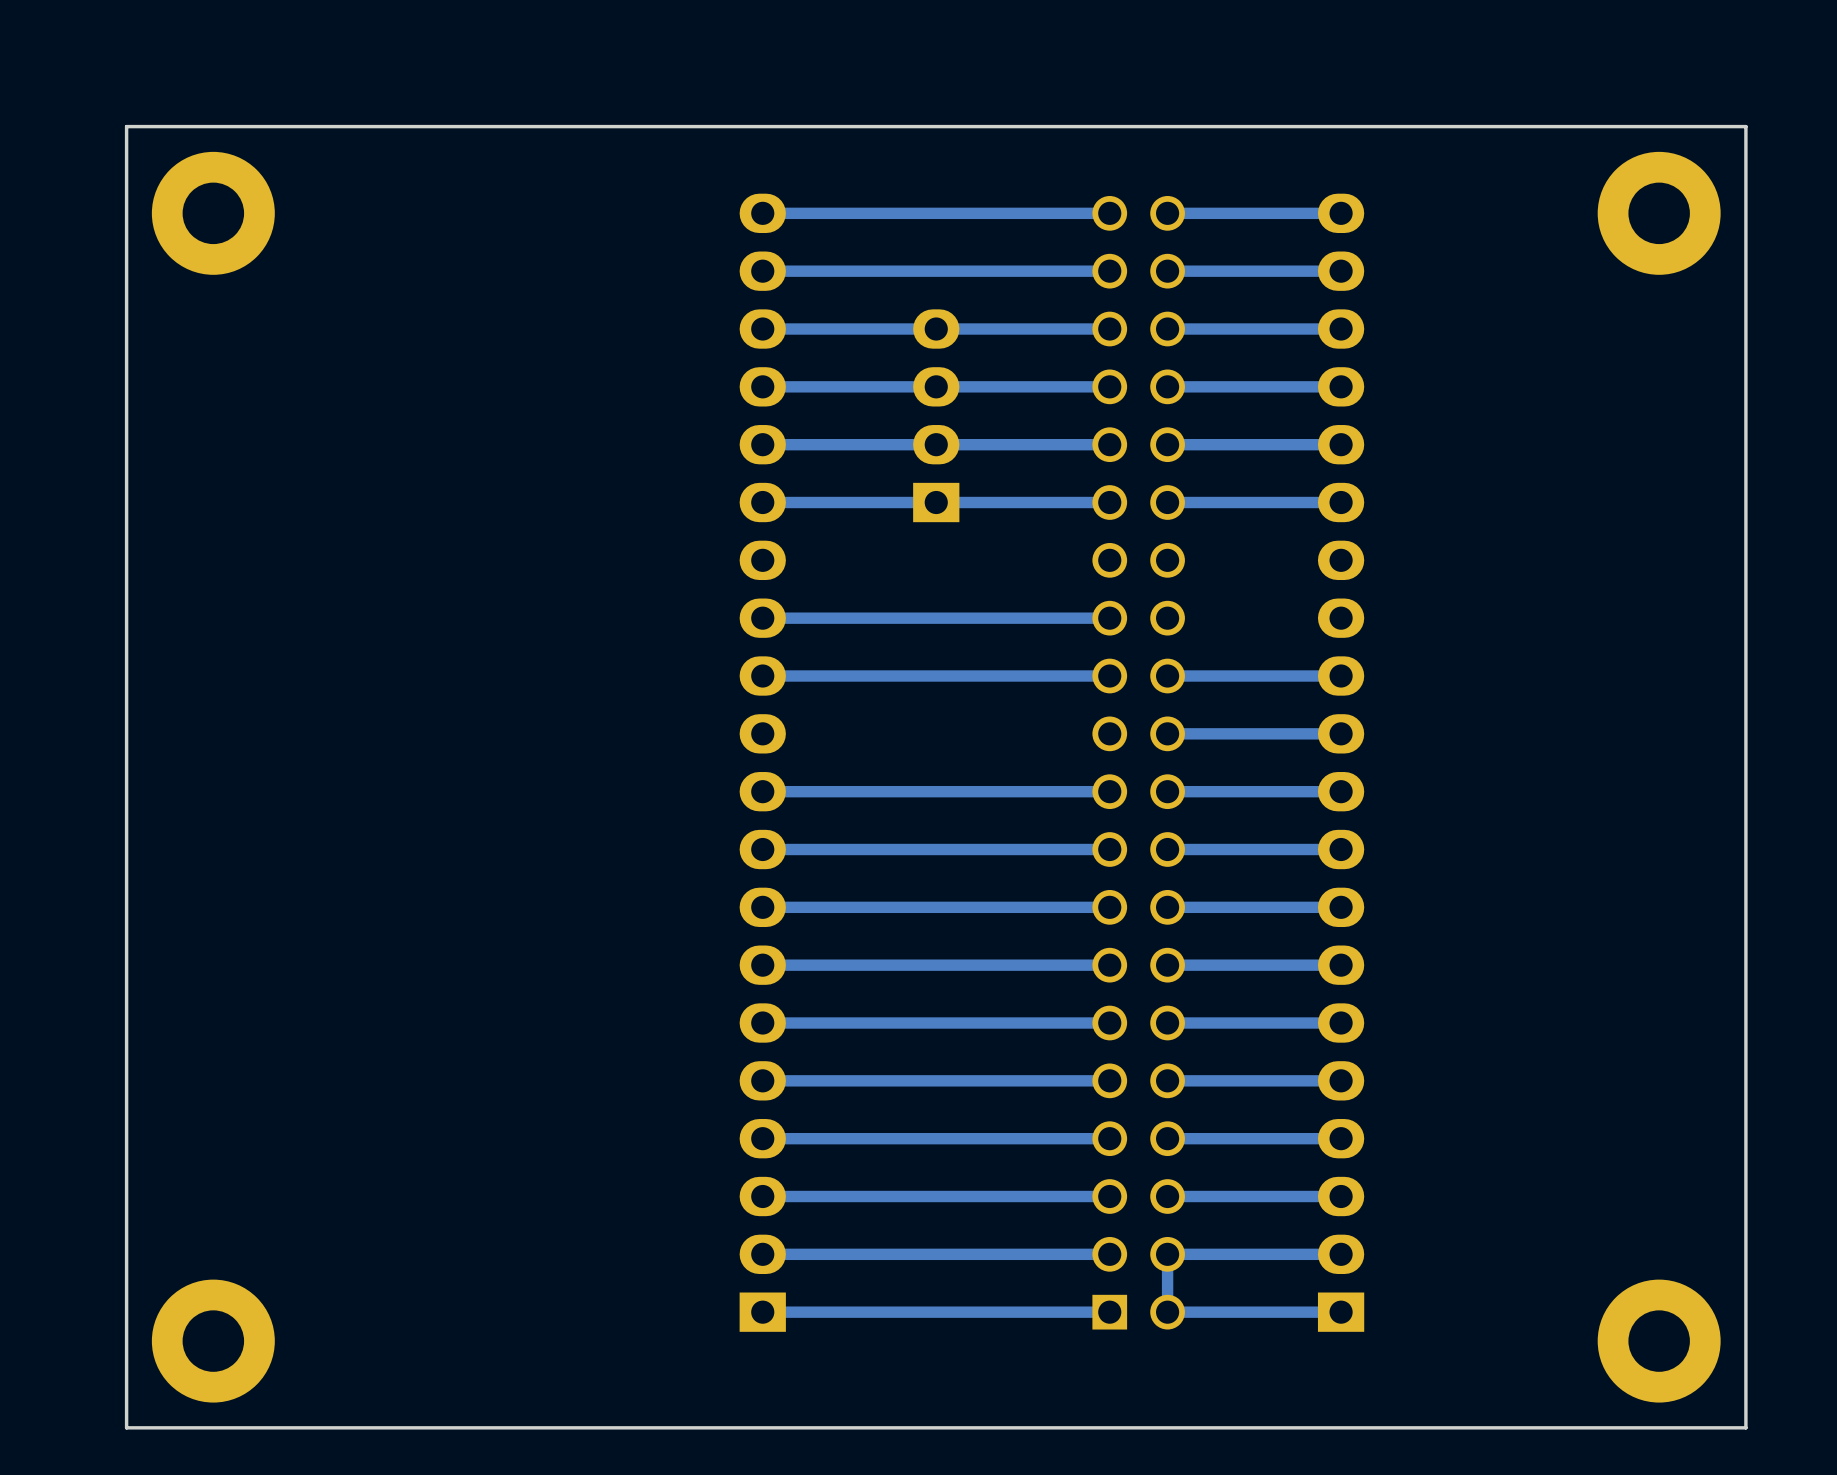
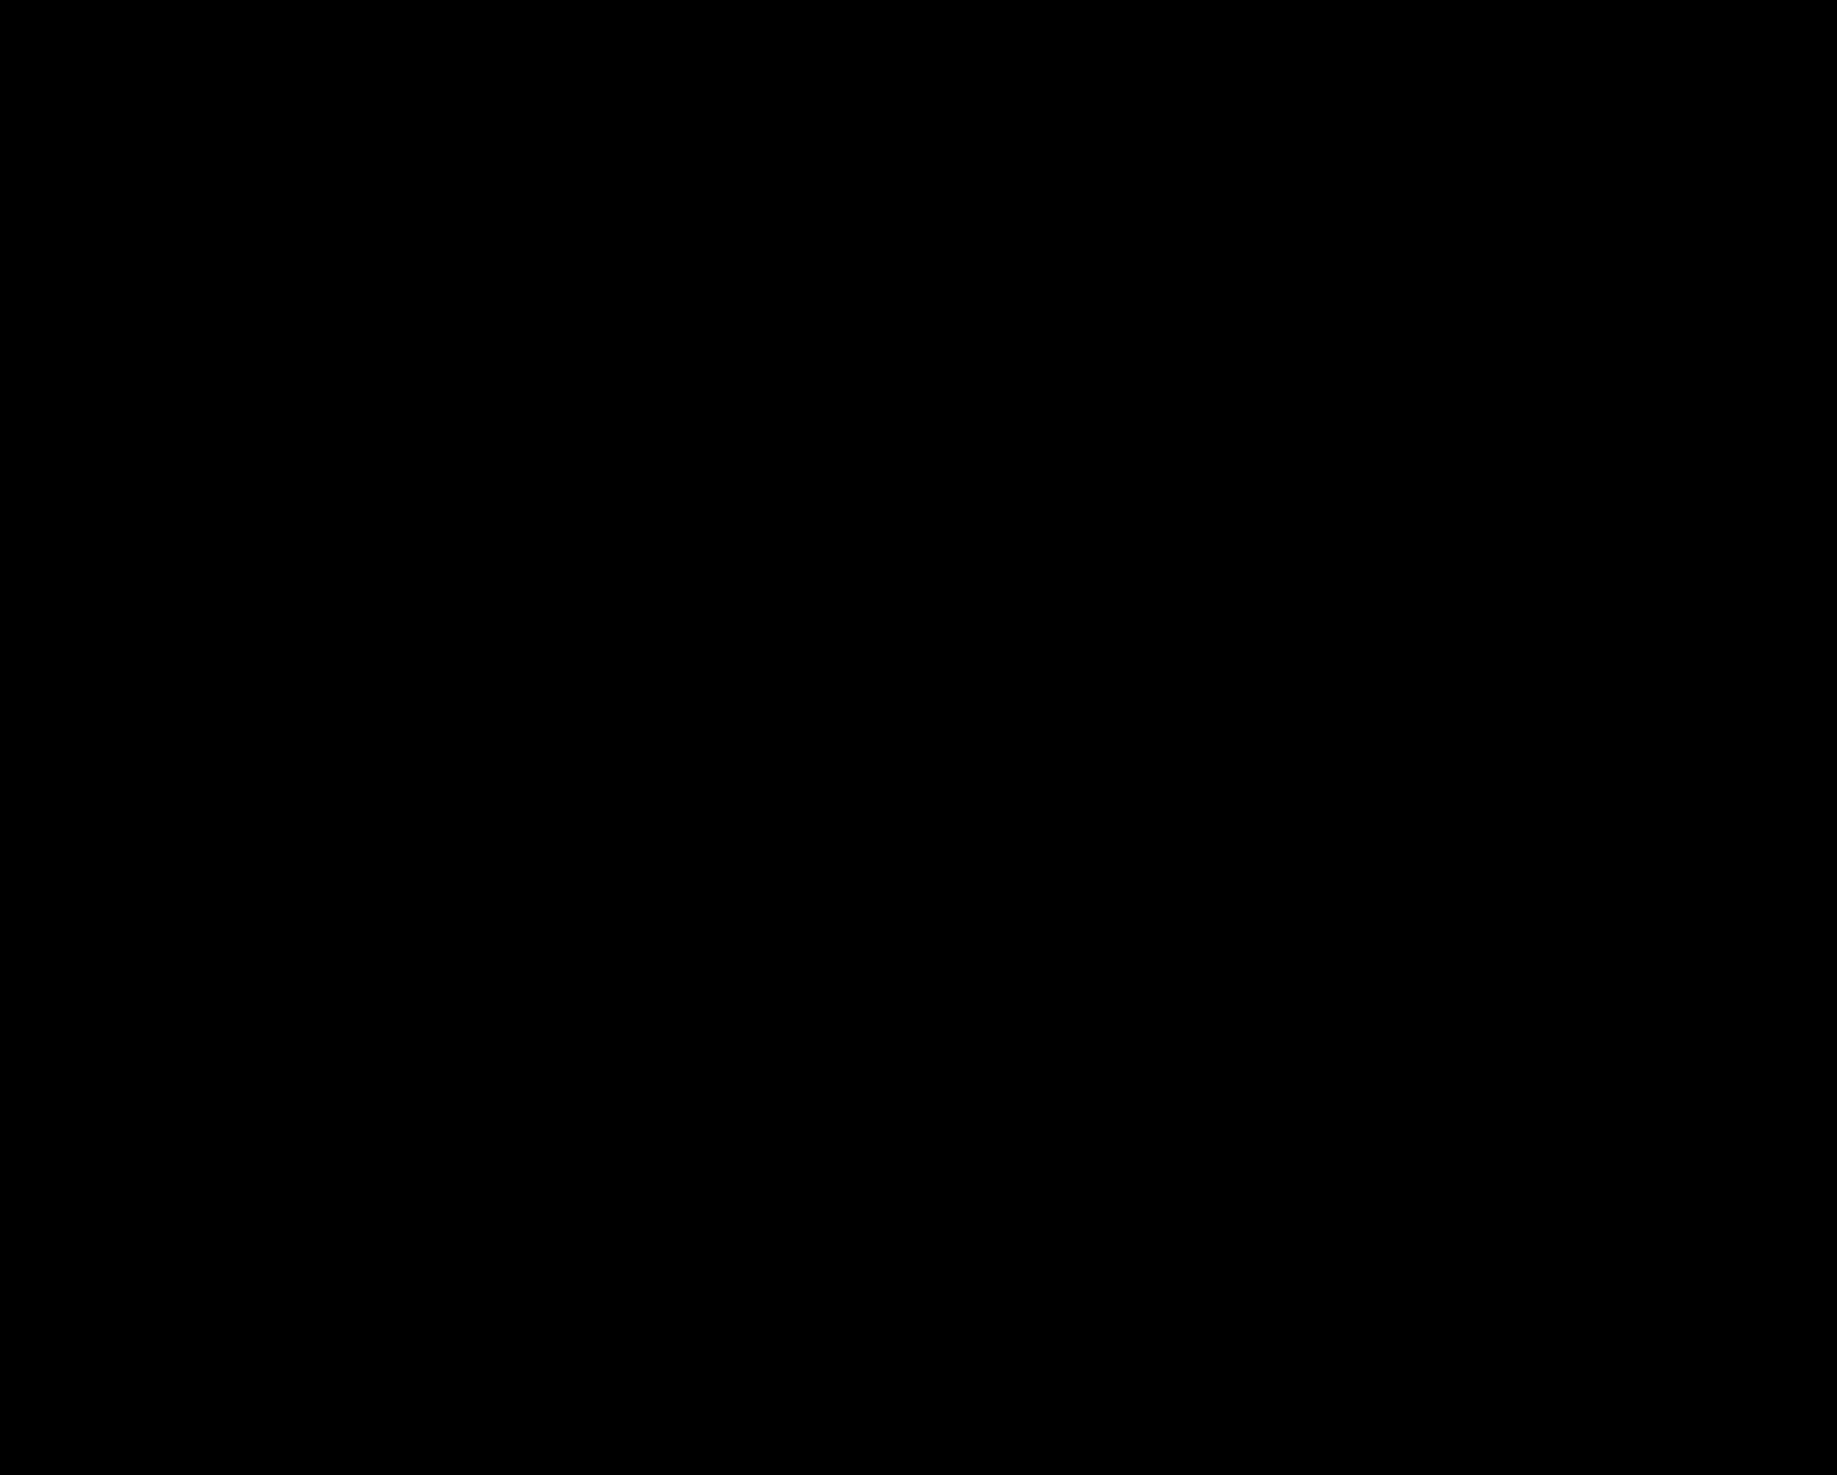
board edge: (1745, 126) (126, 126) (126, 1427) (1745, 1427) (1745, 126) -> none
part: (213, 213) -> none
track: (1109, 213) (762, 213) -> none
track: (1341, 213) (1167, 213) -> none
part: (1659, 213) -> none
track: (1109, 271) (762, 271) -> none
track: (1341, 271) (1167, 271) -> none
track: (1109, 329) (762, 329) -> none
track: (1341, 329) (1167, 329) -> none
track: (1109, 386) (762, 386) -> none
track: (1341, 386) (1167, 386) -> none
part: (936, 415) -> none
track: (1109, 444) (762, 444) -> none
track: (1341, 444) (1167, 444) -> none
track: (1109, 502) (762, 502) -> none
track: (1341, 502) (1167, 502) -> none
track: (1109, 618) (762, 618) -> none
track: (1109, 676) (762, 676) -> none
track: (1341, 676) (1167, 676) -> none
track: (1341, 733) (1167, 733) -> none
part: (762, 762) -> none
part: (1138, 762) -> none
part: (1341, 762) -> none
track: (1109, 791) (762, 791) -> none
track: (1341, 791) (1167, 791) -> none
track: (1109, 849) (762, 849) -> none
track: (1341, 849) (1167, 849) -> none
track: (1109, 907) (762, 907) -> none
track: (1341, 907) (1167, 907) -> none
track: (1109, 965) (762, 965) -> none
track: (1341, 965) (1167, 965) -> none
track: (1109, 1023) (762, 1023) -> none
track: (1341, 1023) (1167, 1023) -> none
track: (1109, 1080) (762, 1080) -> none
track: (1341, 1080) (1167, 1080) -> none
track: (1109, 1138) (762, 1138) -> none
track: (1341, 1138) (1167, 1138) -> none
track: (1109, 1196) (762, 1196) -> none
track: (1341, 1196) (1167, 1196) -> none
track: (1109, 1254) (762, 1254) -> none
track: (1341, 1254) (1167, 1254) (1167, 1312) (1341, 1312) -> none
track: (1109, 1312) (762, 1312) -> none
part: (213, 1341) -> none
part: (1659, 1341) -> none

